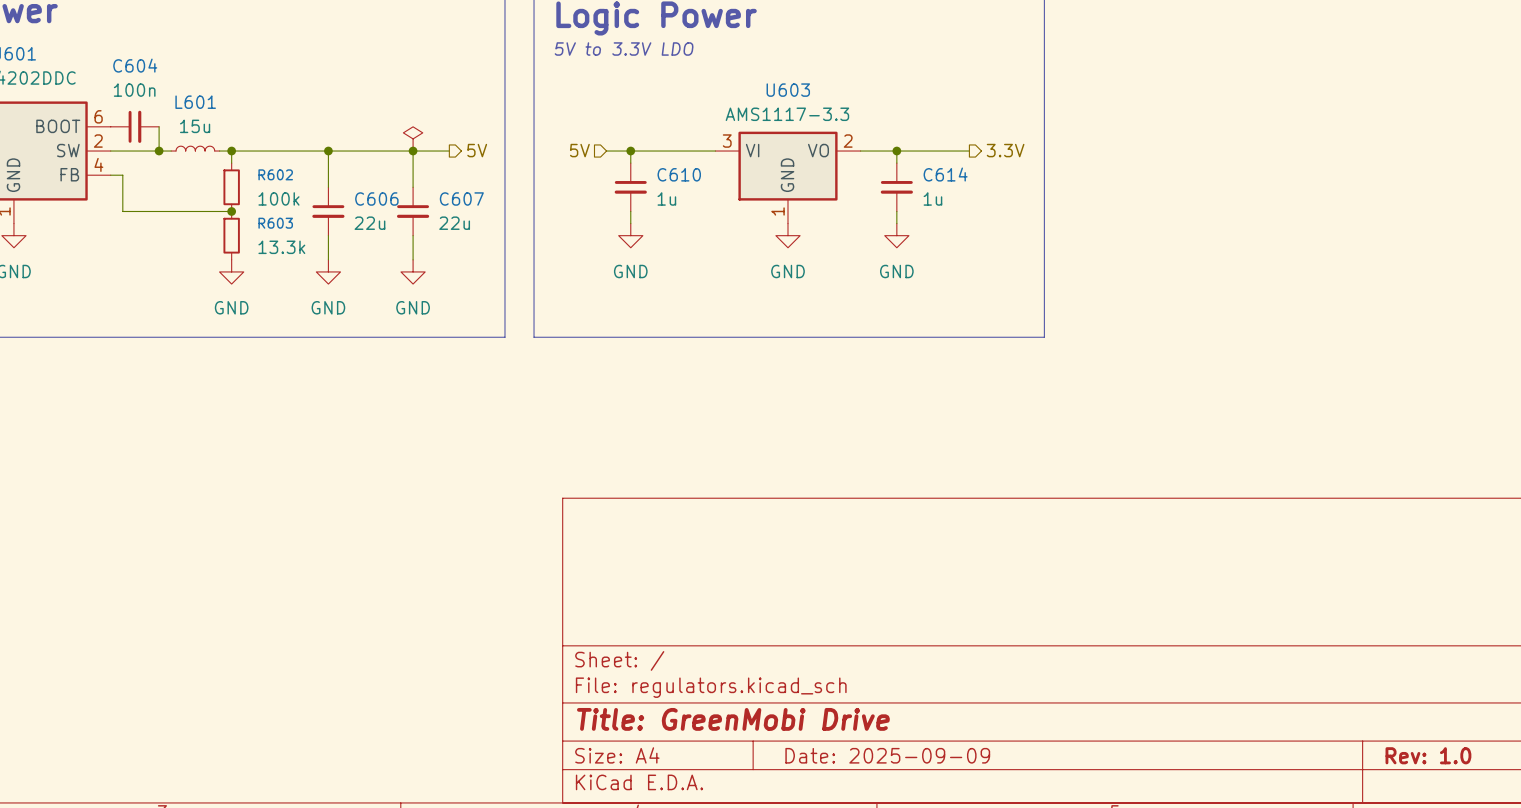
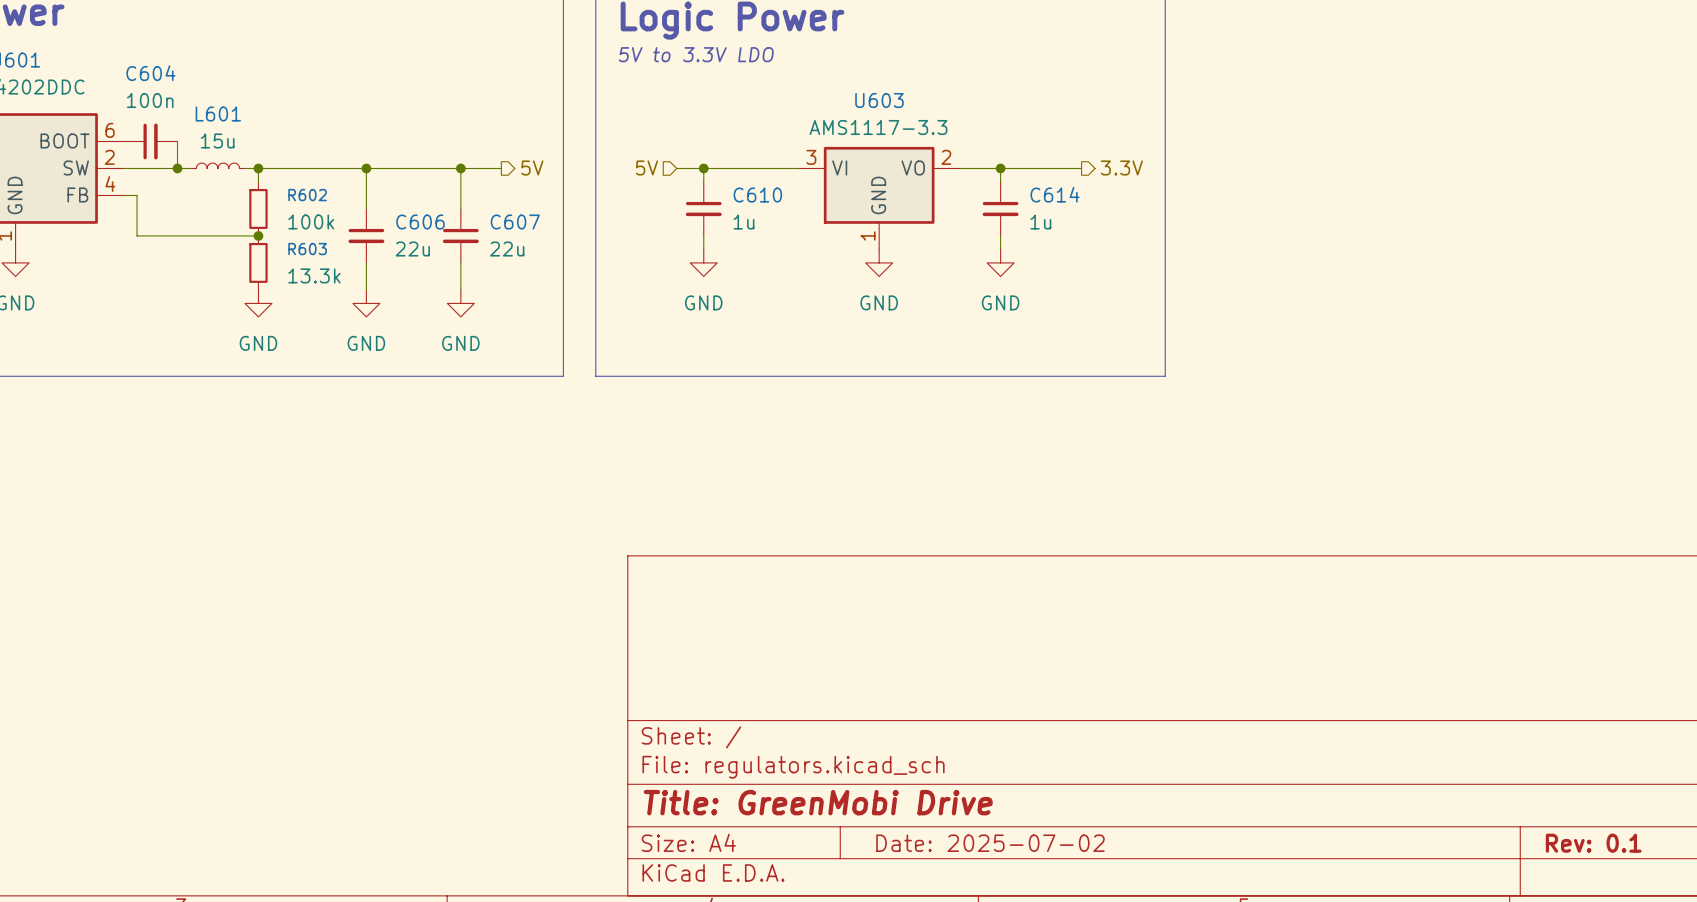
power symbol: (413, 138) -> none
title block: Date: 2025-09-09 (887, 755) -> Date: 2025-07-02 (990, 843)
title block: Rev: 1.0 (1428, 755) -> Rev: 0.1 (1593, 843)

